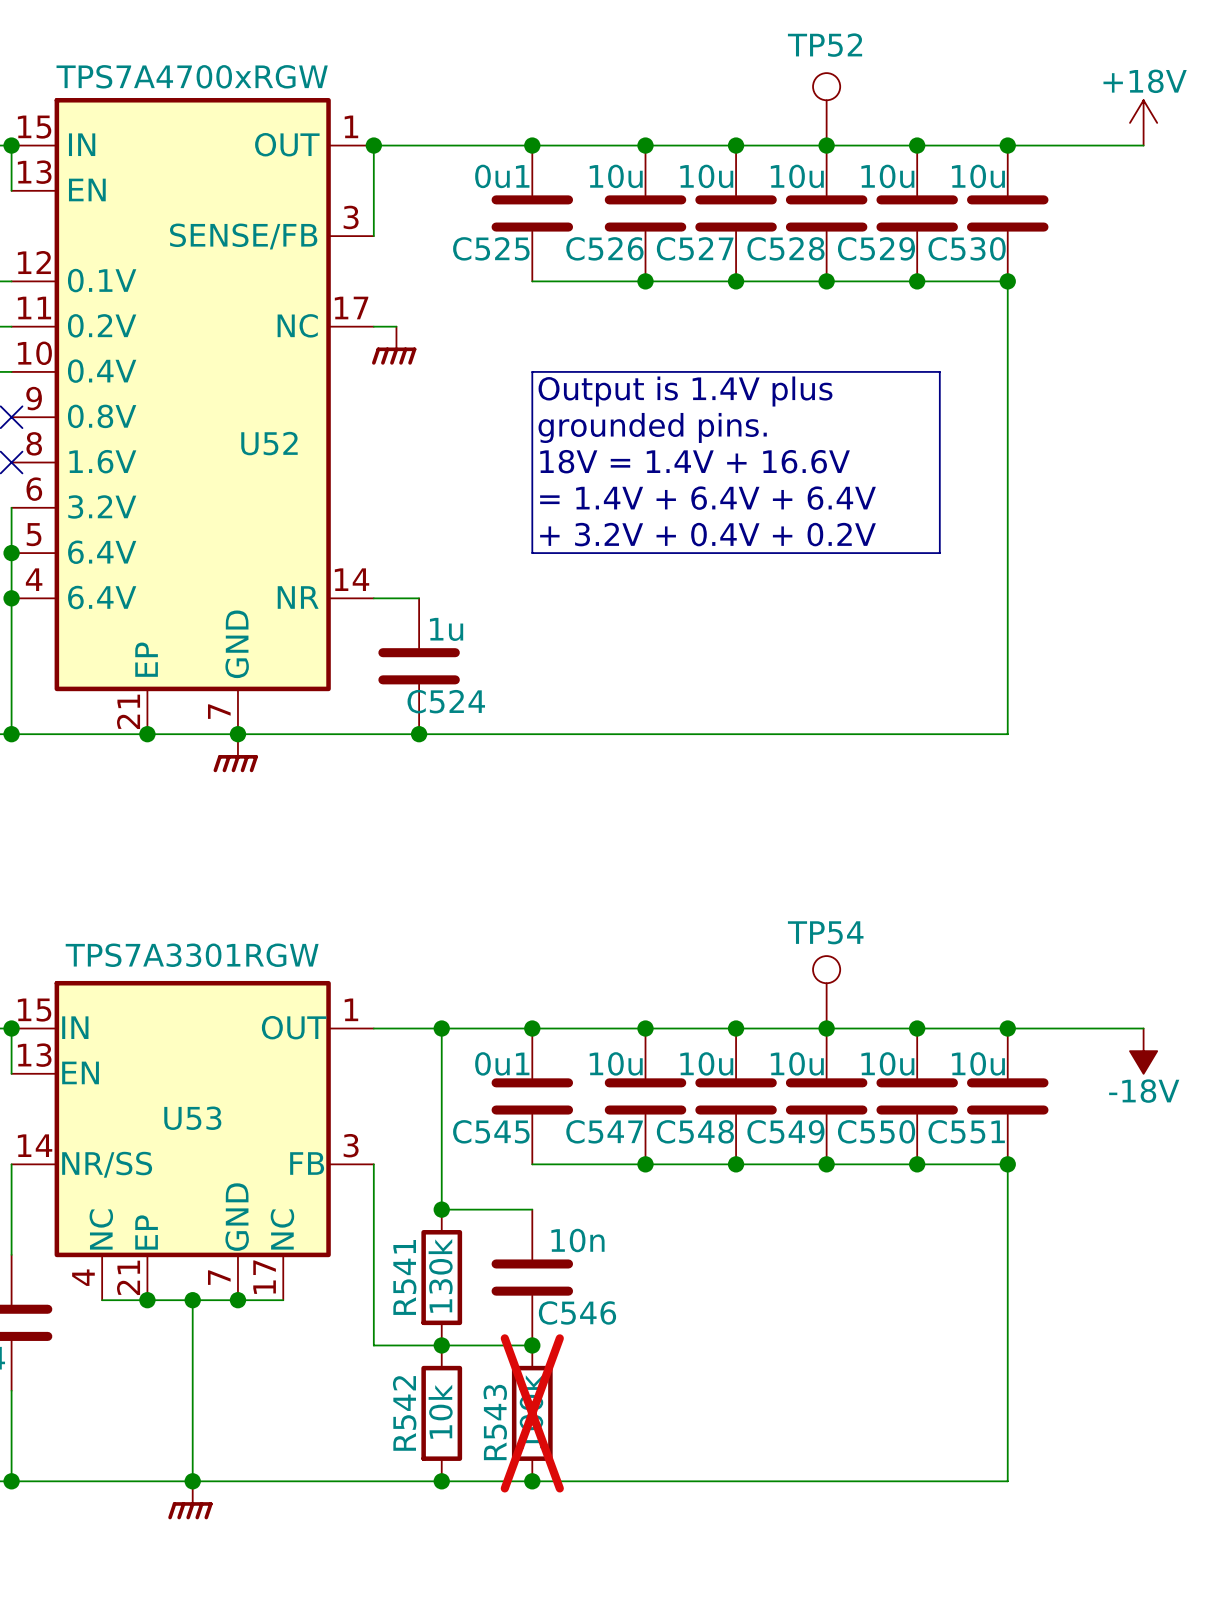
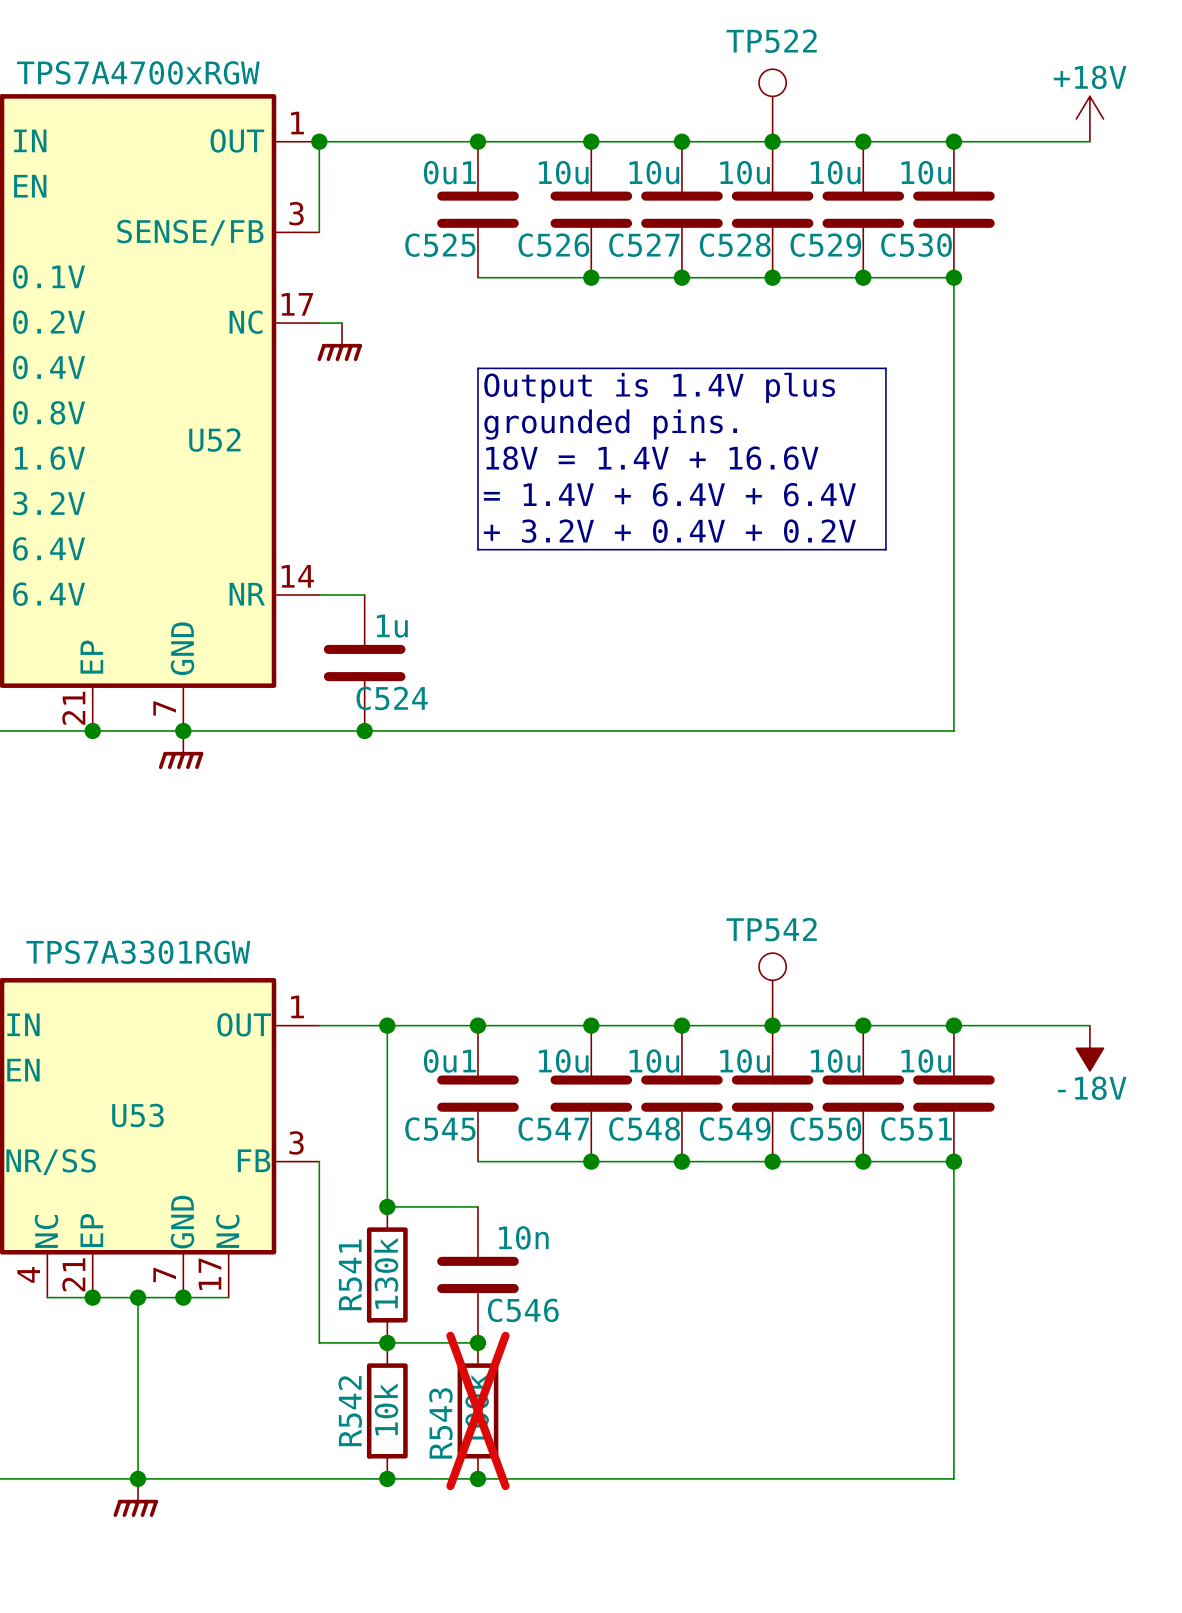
TP52 name: TP52 (825, 45) -> TP522 (771, 41)
TP54 name: TP54 (825, 932) -> TP542 (771, 929)

